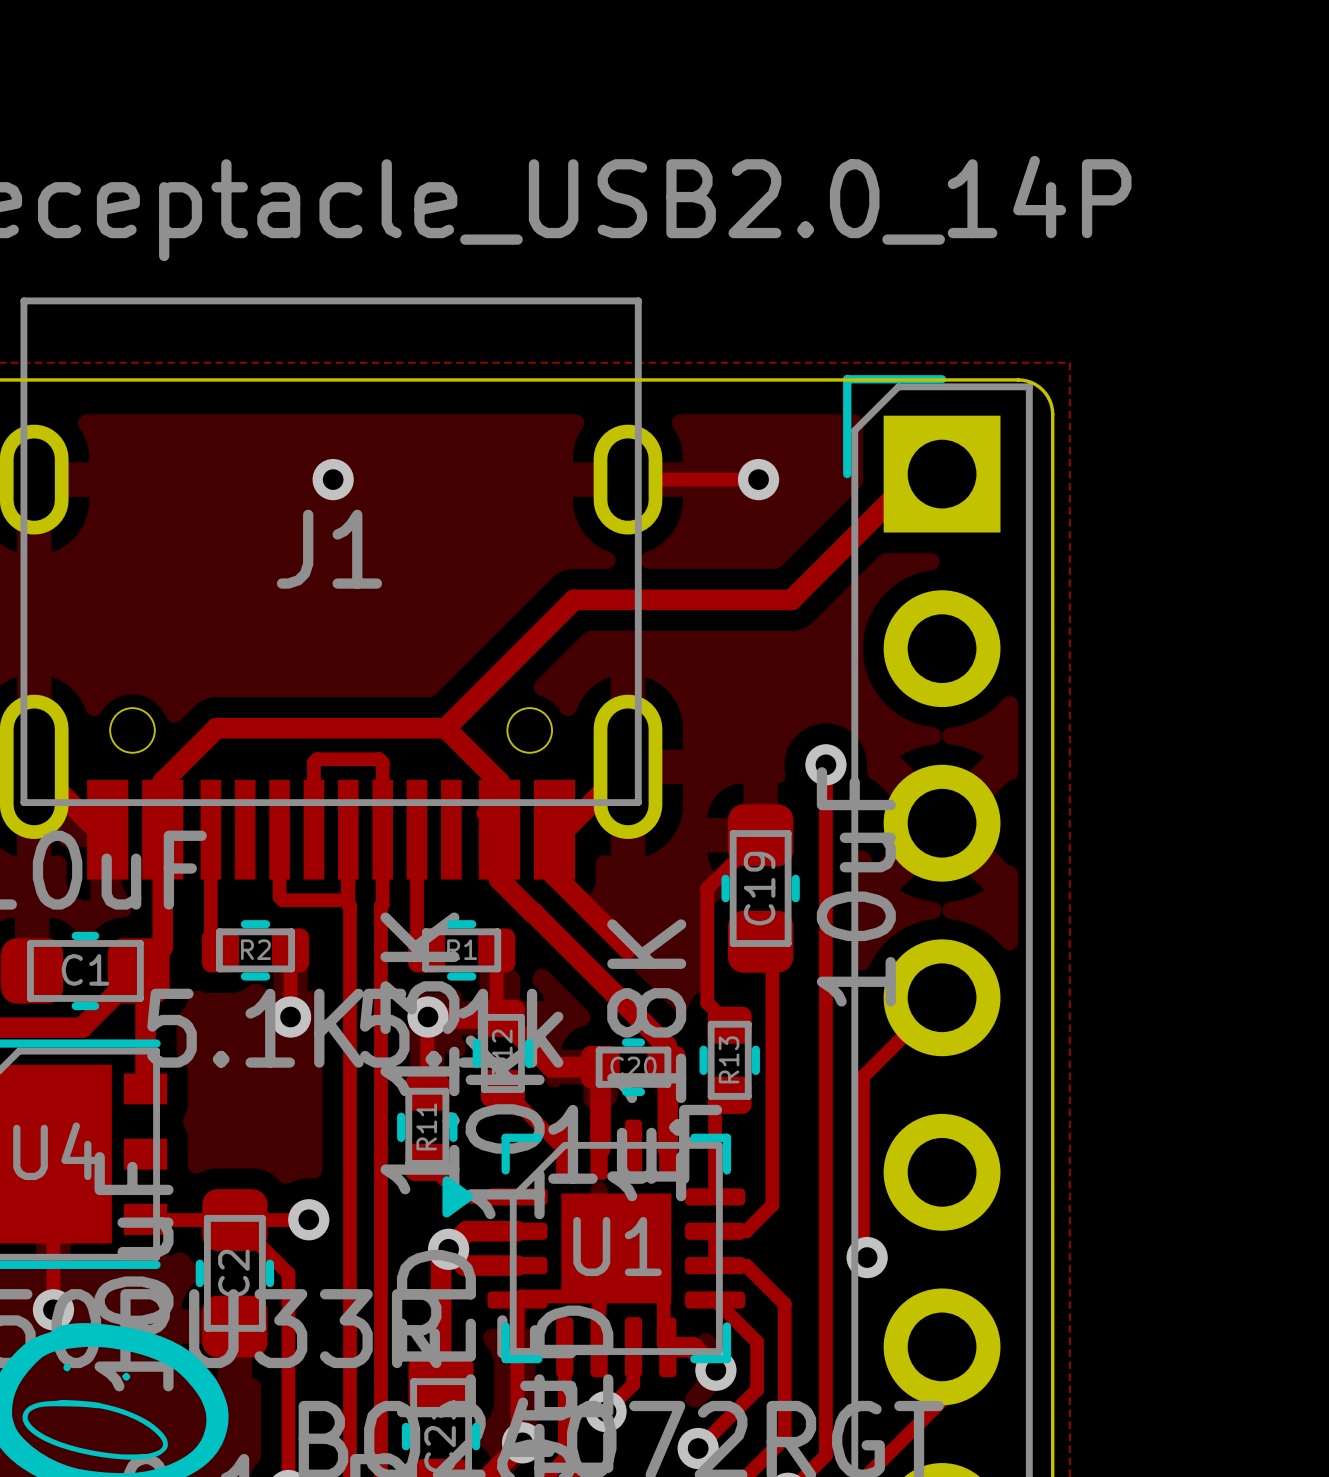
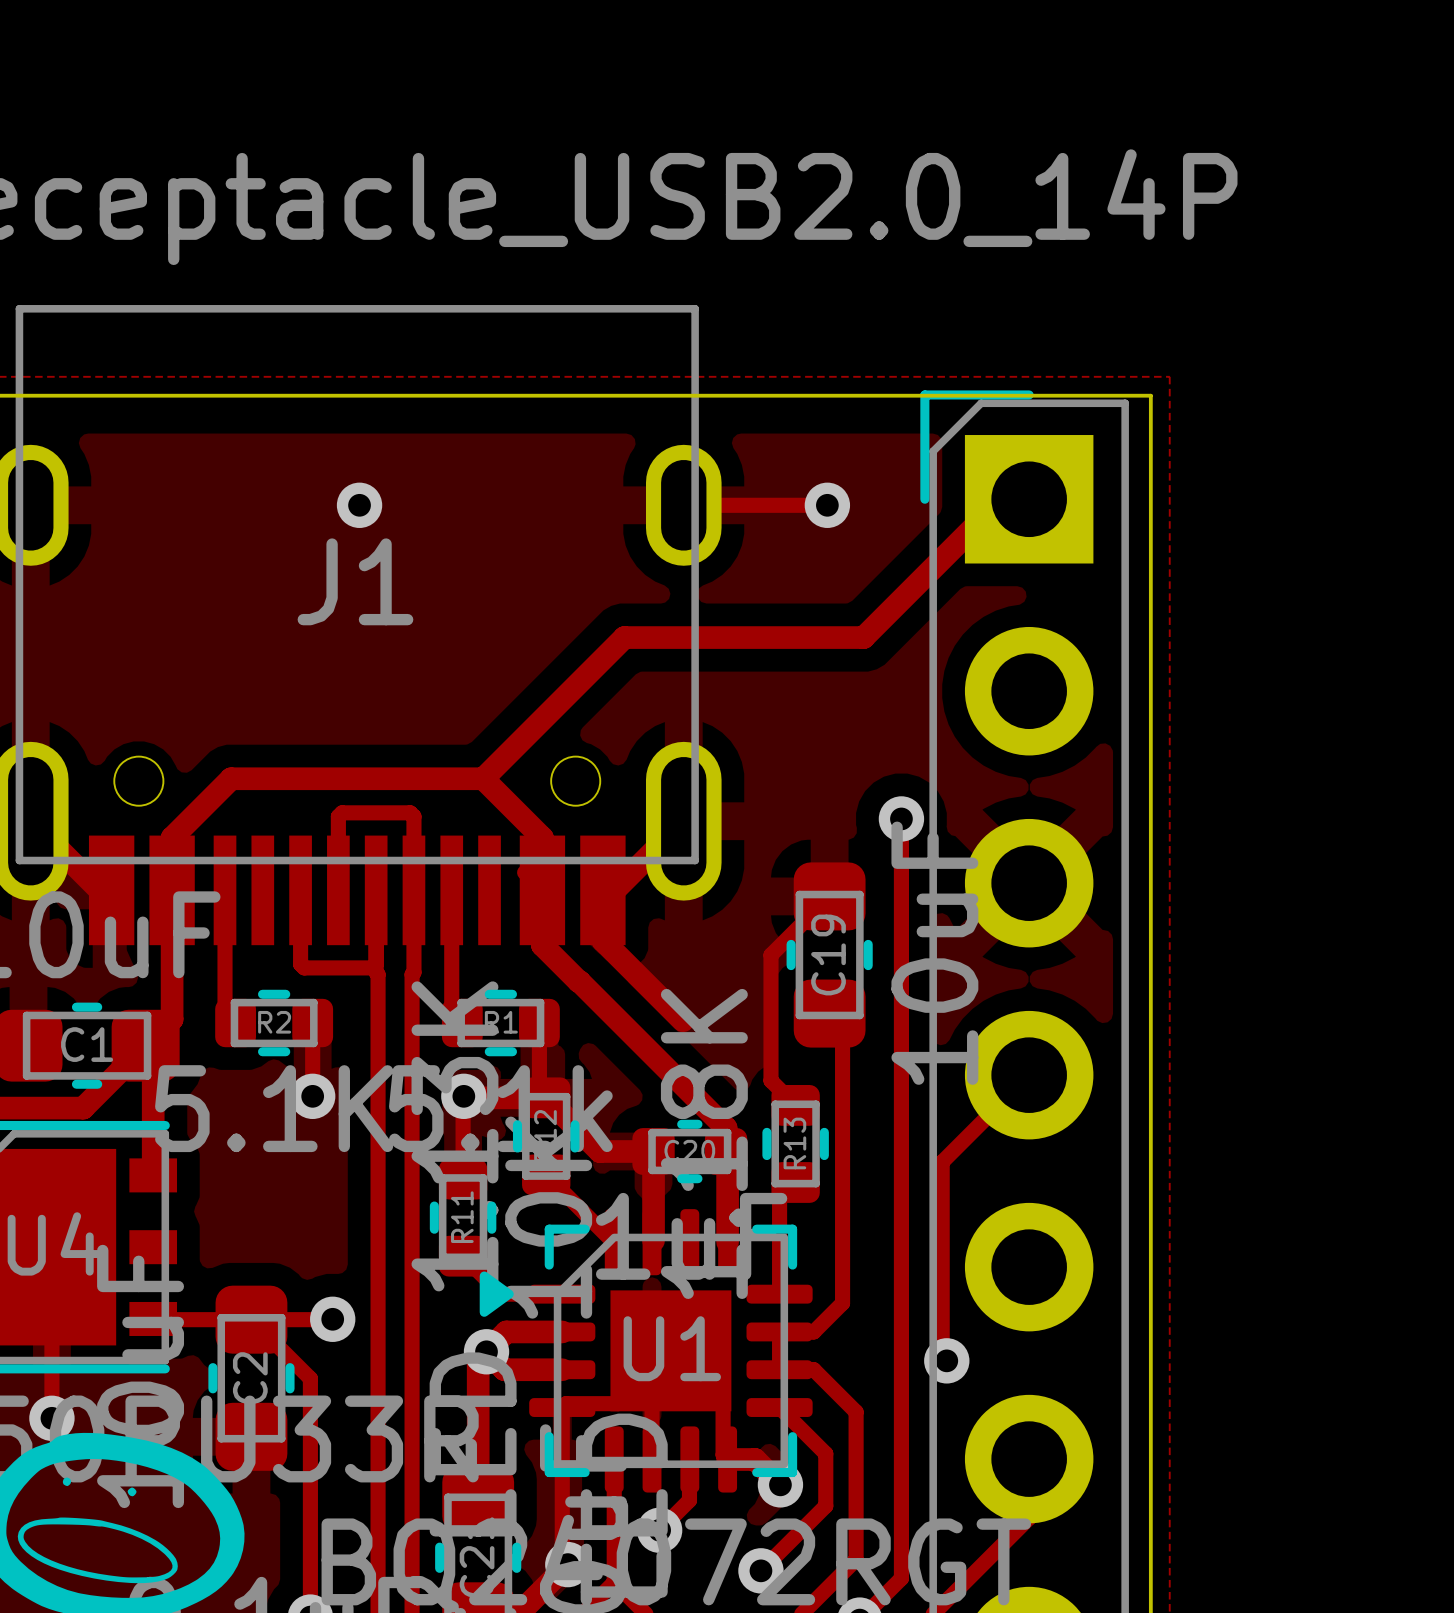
board edge: (1018, 379) (1031, 382) (1042, 390) (1050, 401) (1052, 414) -> (1113, 395) (1150, 395) (1150, 433)

